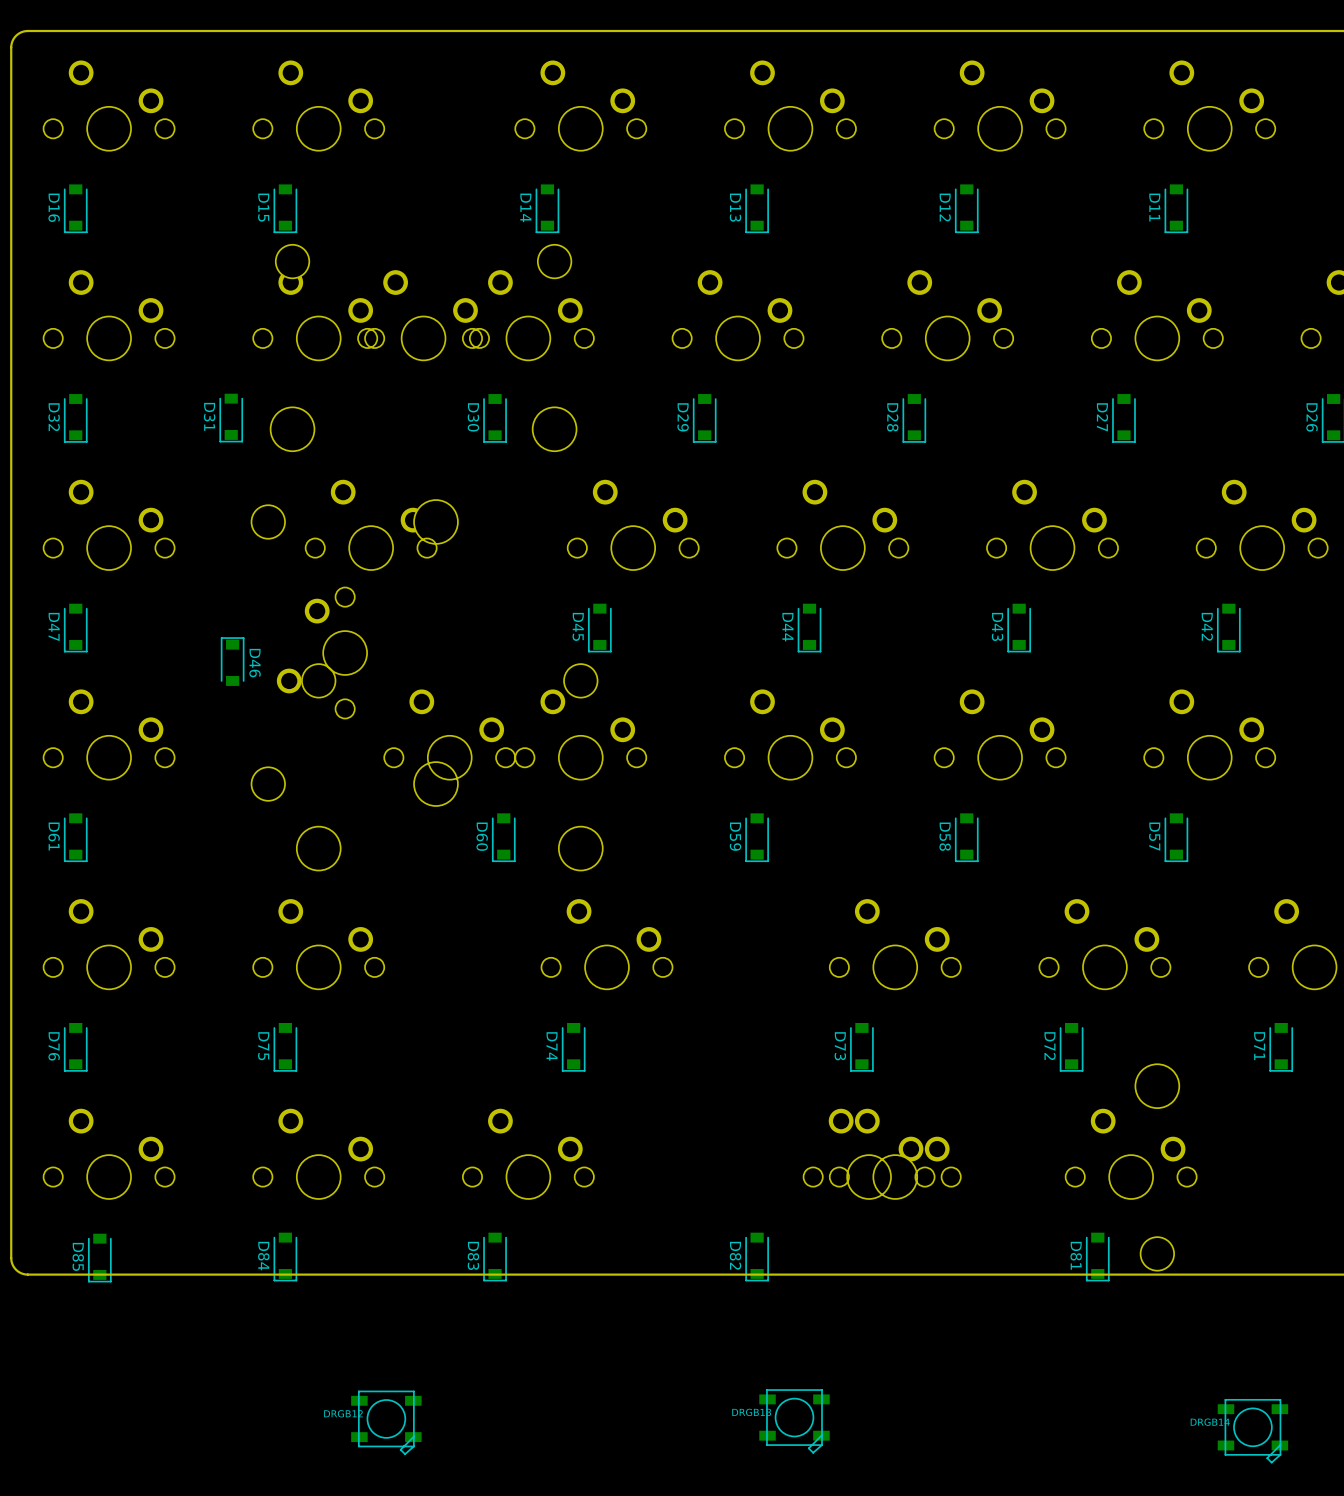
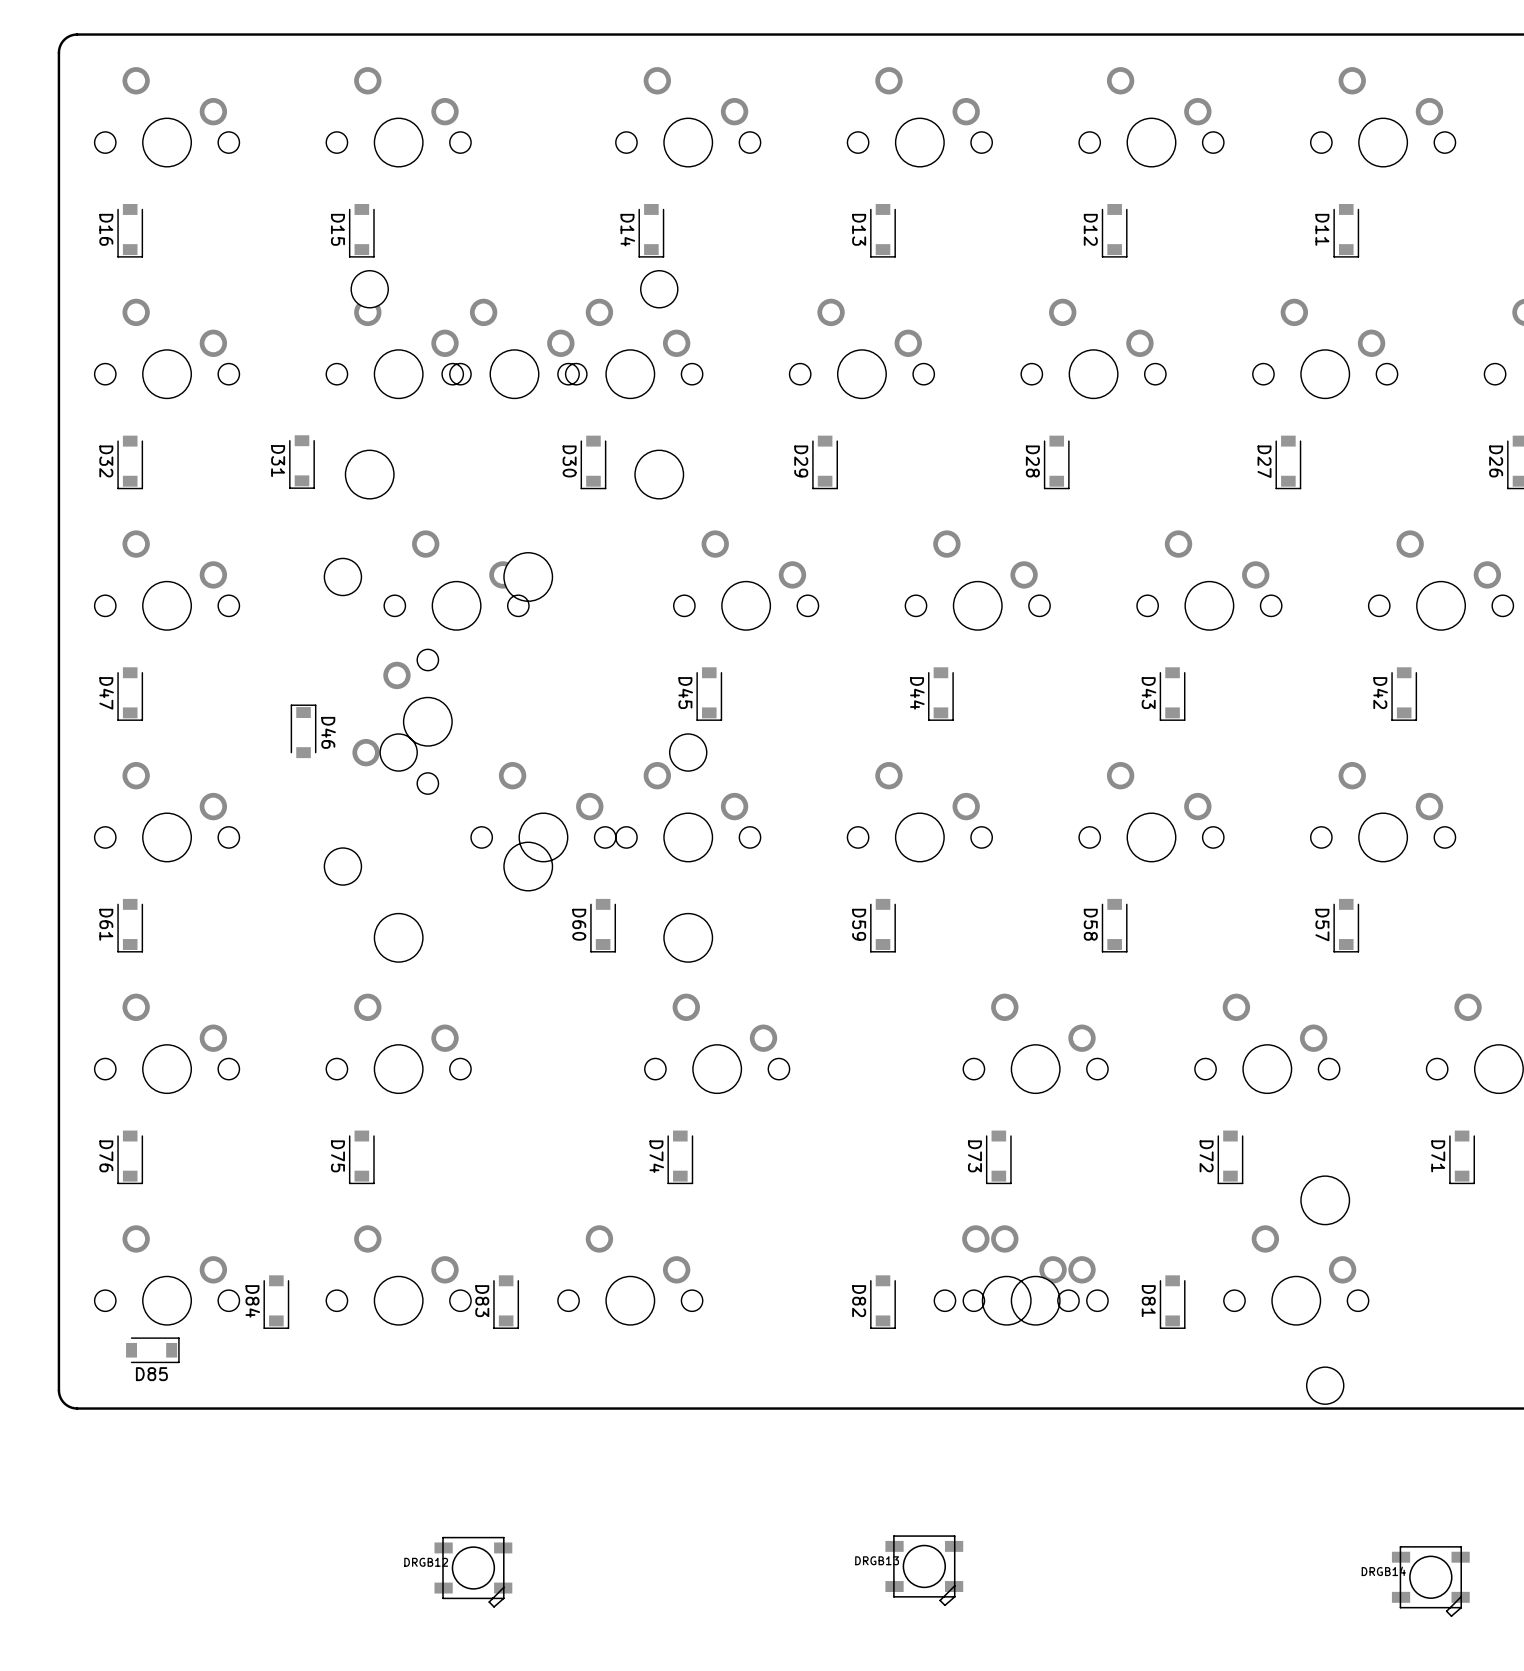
D84 position: (285, 1256) -> (276, 1302)
D83 position: (495, 1256) -> (506, 1302)
D82 position: (757, 1256) -> (883, 1302)
D81 position: (1097, 1256) -> (1172, 1302)
D85 rotation: 0° (99, 1257) -> 90° counterclockwise (152, 1350)
D85 position: (99, 1257) -> (152, 1350)

